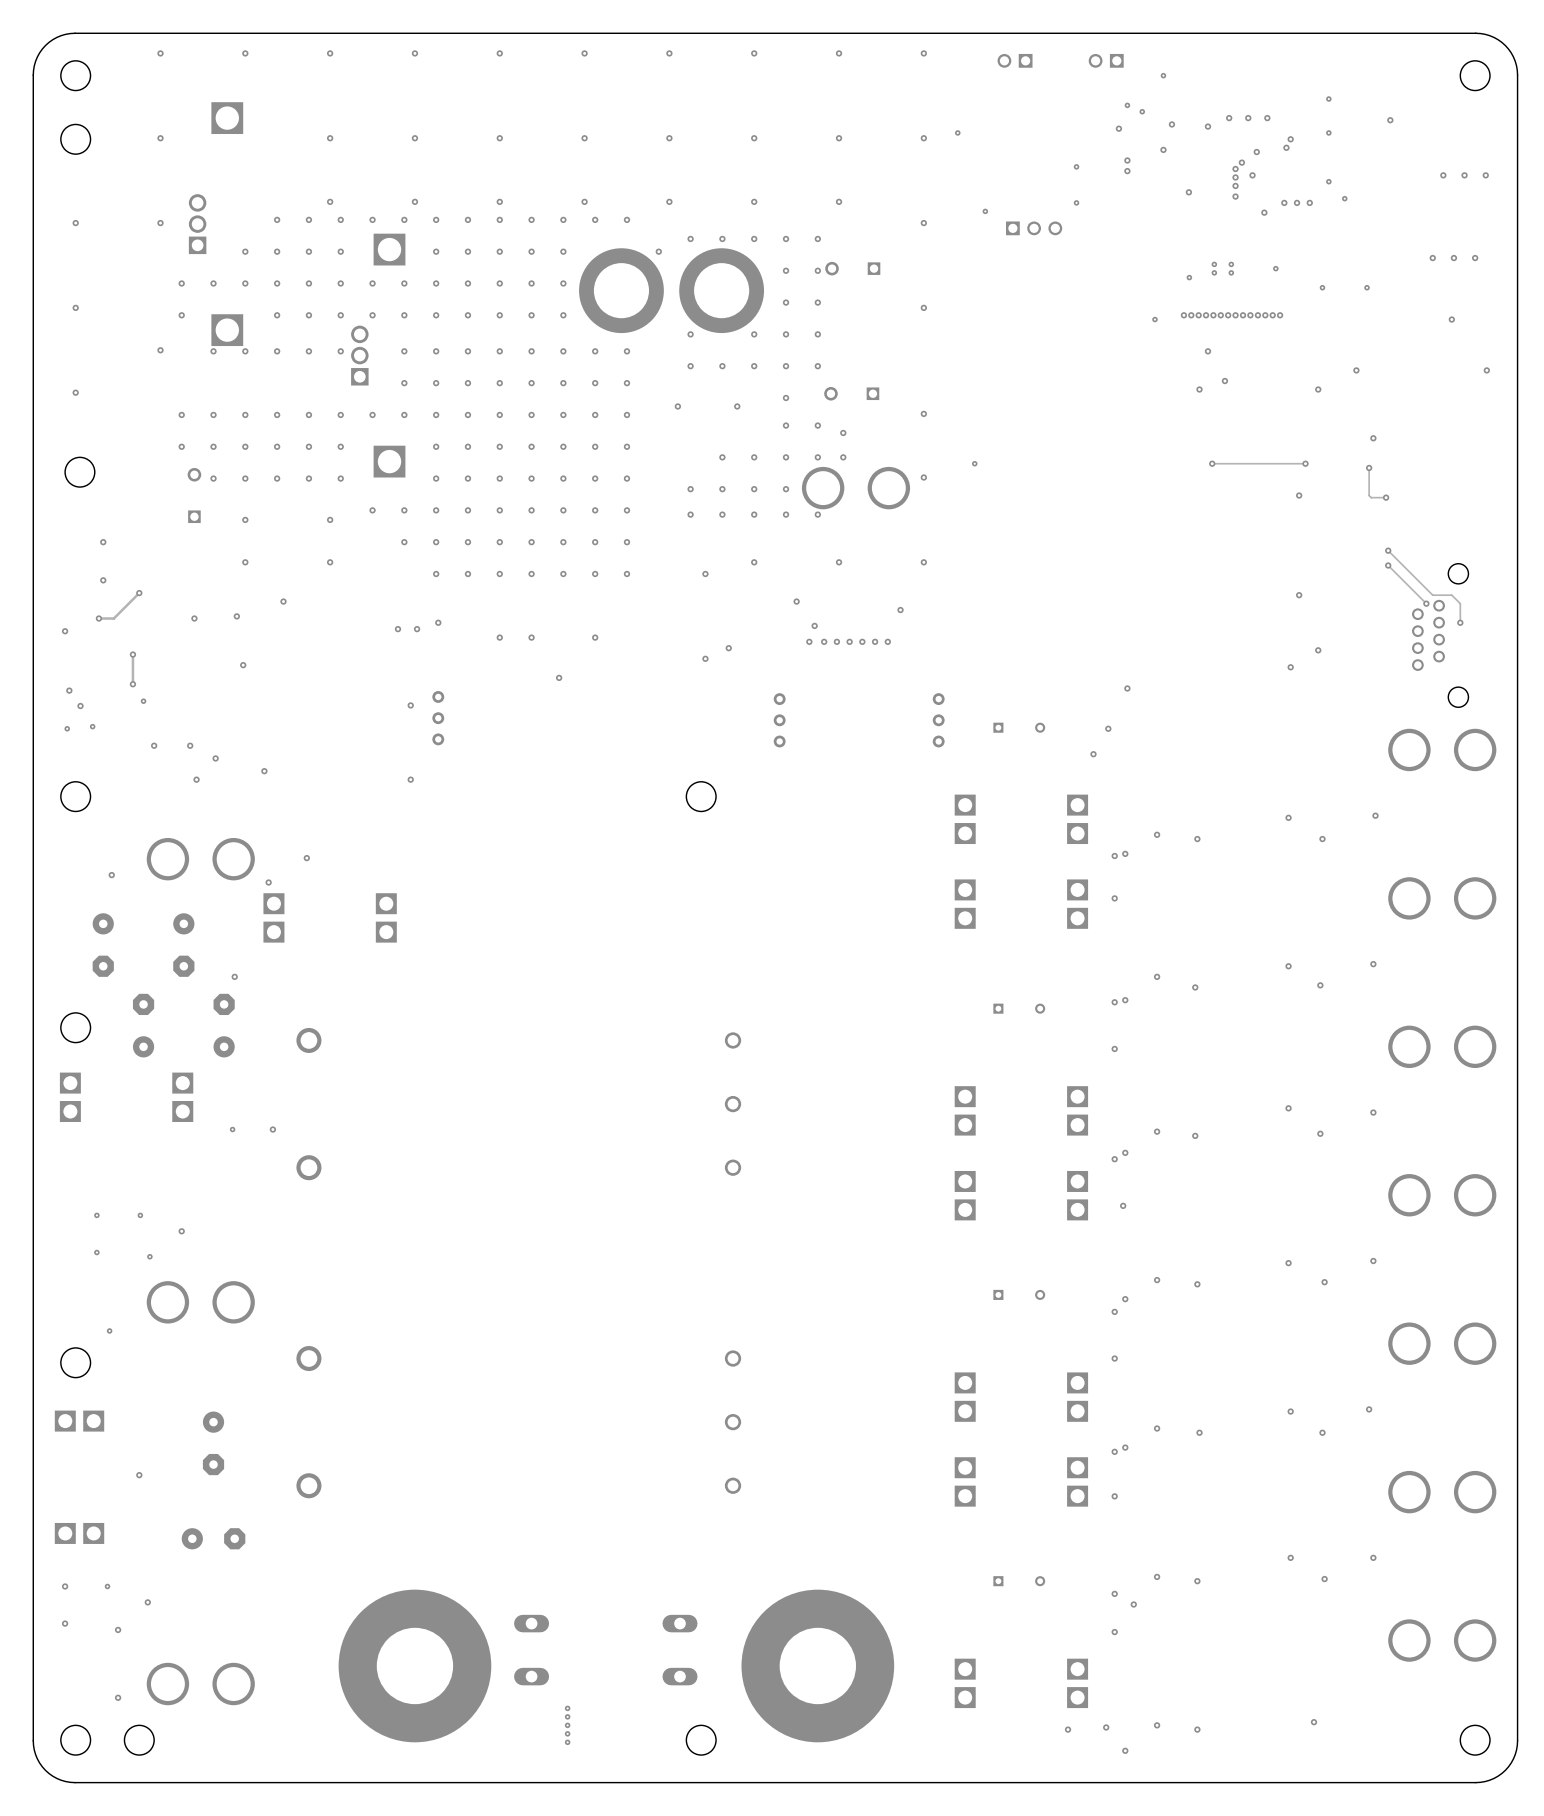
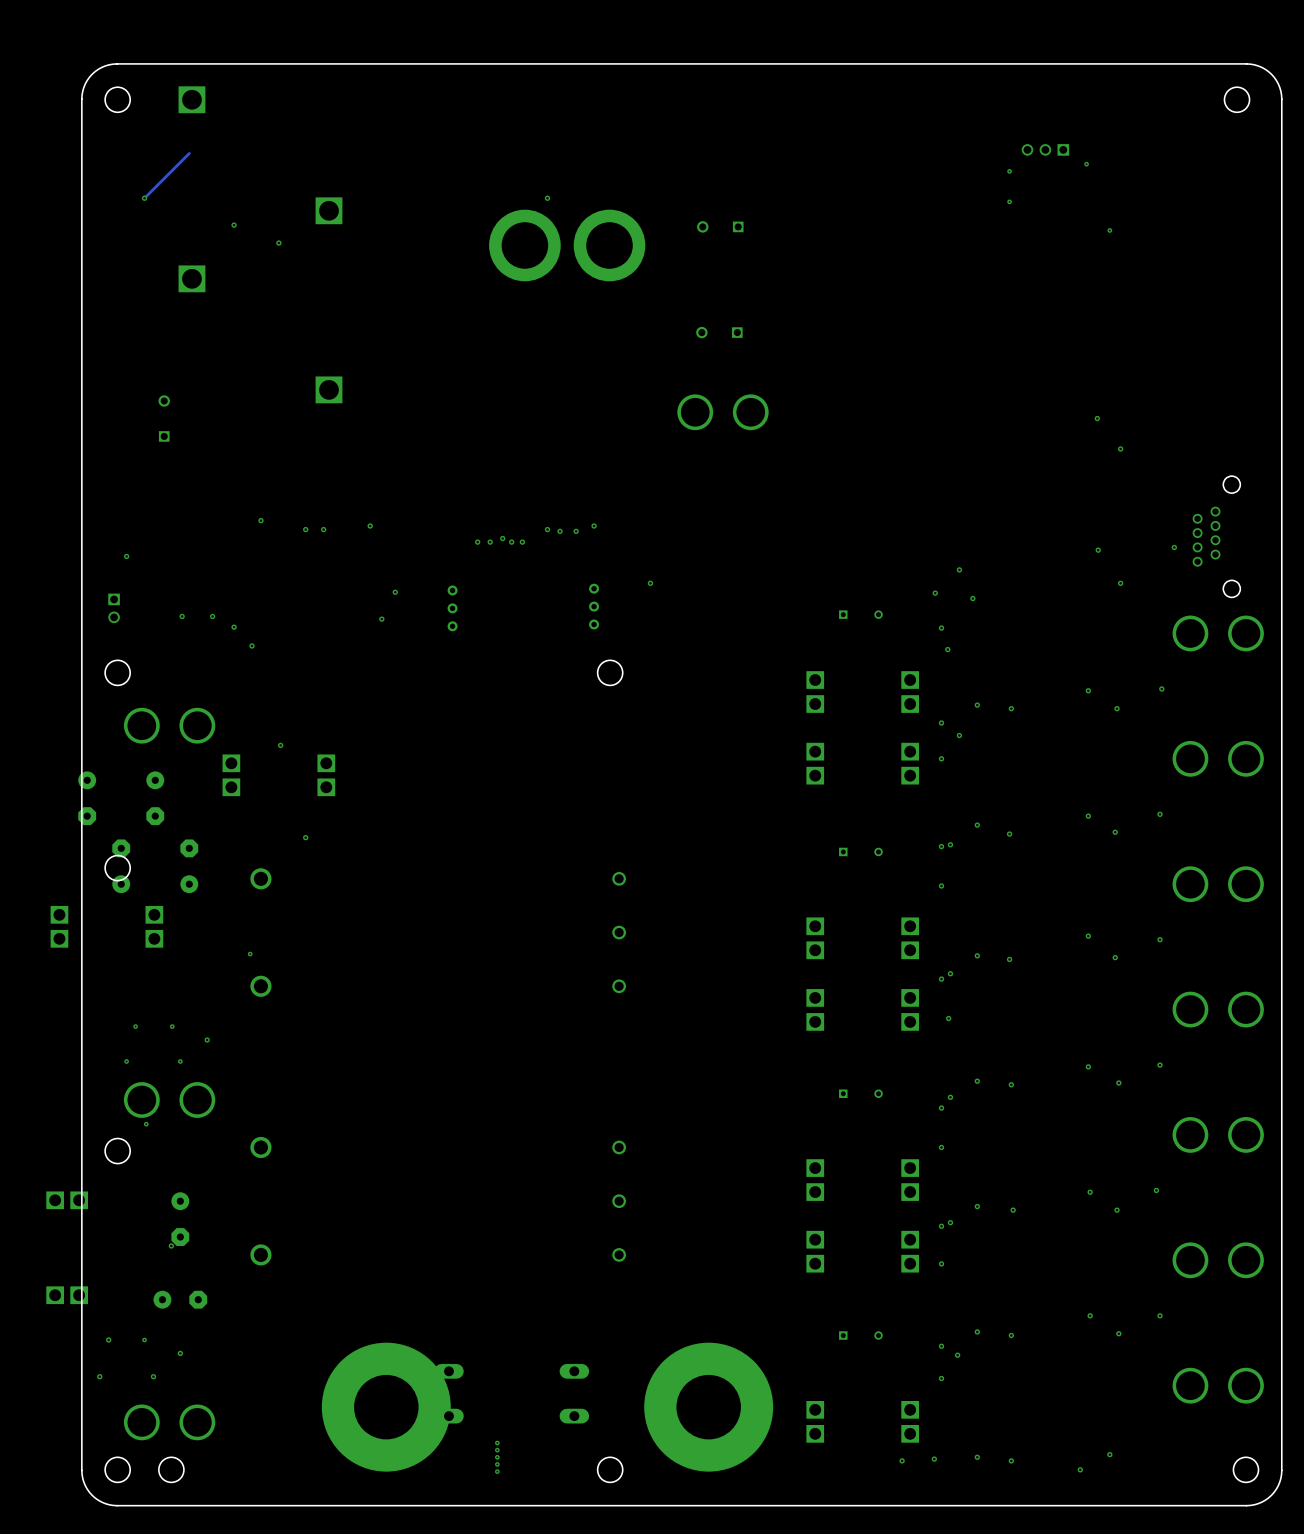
via: (160, 53) -> none
via: (245, 53) -> none
via: (330, 53) -> none
via: (414, 53) -> none
via: (499, 53) -> none
via: (584, 53) -> none
via: (669, 53) -> none
via: (754, 53) -> none
via: (839, 53) -> none
via: (923, 53) -> none
drawing: [60, 60, 91, 91] -> none
part: (1015, 60) -> none
part: (1106, 60) -> none
via: (1163, 75) -> none
drawing position: (1475, 75) -> (1237, 99)
via: (1328, 99) -> none
drawing: none -> [105, 87, 131, 113]
via: (1127, 105) -> none
via: (1142, 111) -> none
board edge: (1517, 117) (1517, 70) (1513, 56) (1508, 49) (1498, 39) (1489, 35) (1475, 33) (75, 33) (56, 37) (42, 49) (35, 61) (33, 75) (33, 1740) (35, 1754) (42, 1766) (49, 1773) (61, 1780) (75, 1782) (138, 1782) -> (1281, 99) (1279, 87) (1271, 74) (1258, 65) (1246, 63) (117, 63) (101, 67) (89, 77) (83, 87) (81, 99) (81, 1470) (83, 1482) (92, 1495) (105, 1503) (117, 1505)
via: (1229, 118) -> none
via: (1248, 118) -> none
via: (1267, 118) -> none
via: (1390, 120) -> none
drawing: [60, 124, 91, 155] -> none
via: (1171, 124) -> none
via: (1207, 126) -> none
via: (1118, 128) -> none
via: (957, 132) -> none
via: (1328, 132) -> none
via: (160, 138) -> none
via: (330, 138) -> none
via: (414, 138) -> none
via: (499, 138) -> none
via: (584, 138) -> none
via: (669, 138) -> none
via: (754, 138) -> none
via: (839, 138) -> none
via: (923, 138) -> none
via: (1290, 139) -> none
via: (1286, 147) -> none
via: (1163, 149) -> none
via: (1256, 152) -> none
via: (1127, 160) -> none
via: (1241, 162) -> none
via: (1076, 166) -> none
via: (1235, 168) -> none
via: (1127, 171) -> none
via: (1252, 175) -> none
via: (1443, 175) -> none
via: (1464, 175) -> none
via: (1485, 175) -> none
via: (1235, 177) -> none
part: none -> (1045, 149)
track: none -> (189, 153) (144, 198)
via: (1328, 181) -> none
via: (1235, 185) -> none
via: (1188, 192) -> none
via: none -> (1086, 164)
via: (1235, 196) -> none
via: (1344, 198) -> none
via: (330, 201) -> none
via: (414, 201) -> none
via: (499, 201) -> none
via: (584, 201) -> none
via: (669, 201) -> none
via: (754, 201) -> none
via: (839, 201) -> none
via: (1076, 202) -> none
via: none -> (1009, 171)
via: (1284, 202) -> none
via: (1297, 202) -> none
via: (1309, 202) -> none
via: (985, 211) -> none
via: (1264, 212) -> none
via: (277, 219) -> none
via: (308, 219) -> none
via: (340, 219) -> none
via: (372, 219) -> none
via: (404, 219) -> none
via: (436, 219) -> none
via: (467, 219) -> none
via: (499, 219) -> none
via: (531, 219) -> none
via: (563, 219) -> none
via: (595, 219) -> none
via: (626, 219) -> none
via: (75, 223) -> none
via position: (160, 223) -> (144, 198)
via: (923, 223) -> none
part: (197, 224) -> none
part: (1034, 228) -> none
via: none -> (547, 198)
via: (690, 238) -> none
via: (722, 238) -> none
via: (754, 238) -> none
via: (786, 238) -> none
via: (817, 238) -> none
via: none -> (1009, 201)
via: (245, 251) -> none
via: (277, 251) -> none
via: (308, 251) -> none
via: (340, 251) -> none
via: (436, 251) -> none
via: (467, 251) -> none
via: (499, 251) -> none
via: (531, 251) -> none
via: (563, 251) -> none
via: (658, 251) -> none
via: (1432, 258) -> none
via: (1453, 258) -> none
via: (1475, 258) -> none
via: (1214, 264) -> none
via: (1231, 264) -> none
via: none -> (234, 225)
via: (1275, 268) -> none
via: (786, 270) -> none
via: (817, 270) -> none
via: (1214, 272) -> none
via: (1231, 272) -> none
via: (1189, 277) -> none
via: (181, 283) -> none
via: (213, 283) -> none
via: (245, 283) -> none
via: (277, 283) -> none
via: (308, 283) -> none
via: (340, 283) -> none
via: (372, 283) -> none
via: (404, 283) -> none
via: (436, 283) -> none
via: (467, 283) -> none
via: (499, 283) -> none
via: (531, 283) -> none
via: (563, 283) -> none
via: none -> (278, 243)
via position: (1322, 287) -> (1109, 230)
via: (1367, 287) -> none
via: (786, 302) -> none
via: (817, 302) -> none
via: (75, 307) -> none
via: (923, 307) -> none
via: (181, 315) -> none
via: (277, 315) -> none
via: (308, 315) -> none
via: (340, 315) -> none
via: (372, 315) -> none
via: (404, 315) -> none
via: (436, 315) -> none
via: (467, 315) -> none
via: (499, 315) -> none
via: (531, 315) -> none
via: (563, 315) -> none
via: (1183, 315) -> none
via: (1191, 315) -> none
via: (1198, 315) -> none
via: (1206, 315) -> none
via: (1213, 315) -> none
via: (1220, 315) -> none
via: (1228, 315) -> none
via: (1235, 315) -> none
via: (1243, 315) -> none
via: (1250, 315) -> none
via: (1257, 315) -> none
via: (1265, 315) -> none
via: (1272, 315) -> none
via: (1280, 315) -> none
via: (1154, 319) -> none
via: (1451, 319) -> none
via: (690, 334) -> none
via: (754, 334) -> none
via: (786, 334) -> none
via: (817, 334) -> none
via: (160, 350) -> none
via: (213, 351) -> none
via: (245, 351) -> none
via: (277, 351) -> none
via: (308, 351) -> none
via: (340, 351) -> none
via: (404, 351) -> none
via: (436, 351) -> none
via: (467, 351) -> none
via: (499, 351) -> none
via: (531, 351) -> none
via: (563, 351) -> none
via: (595, 351) -> none
via: (626, 351) -> none
via: (1207, 351) -> none
part: (359, 355) -> none
via: (690, 366) -> none
via: (722, 366) -> none
via: (754, 366) -> none
via: (786, 366) -> none
via: (817, 366) -> none
via: (1356, 370) -> none
via: (1486, 370) -> none
via: (1224, 381) -> none
via: (404, 383) -> none
via: (436, 383) -> none
via: (467, 383) -> none
via: (499, 383) -> none
via: (531, 383) -> none
via: (563, 383) -> none
via: (595, 383) -> none
via: (626, 383) -> none
via: (1199, 389) -> none
via: (1318, 389) -> none
via: (75, 392) -> none
via: (786, 397) -> none
via: (677, 406) -> none
via: (737, 406) -> none
via: (923, 413) -> none
via: (181, 414) -> none
via: (213, 414) -> none
via: (245, 414) -> none
via: (277, 414) -> none
via: (308, 414) -> none
via: (340, 414) -> none
via: (372, 414) -> none
via: (404, 414) -> none
via: (436, 414) -> none
via: (467, 414) -> none
via: (499, 414) -> none
via: (531, 414) -> none
via: (563, 414) -> none
via: (595, 414) -> none
via: (626, 414) -> none
via: (786, 425) -> none
via: (817, 425) -> none
via: (843, 432) -> none
via: (1373, 438) -> none
via: (181, 446) -> none
via: (213, 446) -> none
via: (245, 446) -> none
via: (277, 446) -> none
via: (308, 446) -> none
via: (340, 446) -> none
via: (436, 446) -> none
via: (467, 446) -> none
via: (499, 446) -> none
via: (531, 446) -> none
via: (563, 446) -> none
via: (595, 446) -> none
via: (626, 446) -> none
drawing: [64, 457, 95, 488] -> none
via: (722, 457) -> none
via: (754, 457) -> none
via: (786, 457) -> none
via: (817, 457) -> none
via: (843, 457) -> none
via: (974, 463) -> none
via: (1212, 463) -> none
track: (1305, 463) (1212, 463) -> none
via: (1305, 463) -> none
track: (1369, 467) (1369, 495) (1371, 497) (1386, 497) -> none
via: (1369, 467) -> none
via: (923, 477) -> none
via: (213, 478) -> none
via: (245, 478) -> none
via: (277, 478) -> none
via: (308, 478) -> none
via: (340, 478) -> none
via: (436, 478) -> none
via: (467, 478) -> none
via: (499, 478) -> none
via: (531, 478) -> none
via: (563, 478) -> none
via: (595, 478) -> none
via: (626, 478) -> none
via: (690, 489) -> none
via: (722, 489) -> none
via: (754, 489) -> none
via: (786, 489) -> none
via: (1386, 497) -> none
via: (372, 510) -> none
via: (404, 510) -> none
via: (436, 510) -> none
via: (467, 510) -> none
via: (499, 510) -> none
via: (531, 510) -> none
via: (563, 510) -> none
via: (595, 510) -> none
via: (626, 510) -> none
via: (690, 514) -> none
via: (722, 514) -> none
via: (754, 514) -> none
via: (786, 514) -> none
via: (817, 514) -> none
via: (245, 519) -> none
via: (330, 519) -> none
via: none -> (1120, 448)
via: (103, 542) -> none
via: (404, 542) -> none
via: (436, 542) -> none
via: (467, 542) -> none
via: (499, 542) -> none
via: (531, 542) -> none
via: (563, 542) -> none
via: (595, 542) -> none
via: (626, 542) -> none
track: (1388, 550) (1432, 595) (1451, 595) (1460, 603) (1460, 622) -> none
via: (1388, 550) -> none
via: (245, 562) -> none
via: (330, 562) -> none
via: (754, 562) -> none
via: (839, 562) -> none
via: (923, 562) -> none
track: (1388, 565) (1426, 603) -> none
via: (1388, 565) -> none
via: (436, 573) -> none
via: (467, 573) -> none
via: (499, 573) -> none
via: (531, 573) -> none
via: (563, 573) -> none
via: (595, 573) -> none
via: (626, 573) -> none
via: (705, 573) -> none
via: (103, 580) -> none
track: (139, 593) (113, 618) (98, 618) -> none
via: (139, 593) -> none
via: (1299, 595) -> none
via: (283, 601) -> none
via: (796, 601) -> none
via: (1426, 603) -> none
via: (900, 610) -> none
via: (236, 616) -> none
via: none -> (260, 520)
via: (98, 618) -> none
via: (194, 618) -> none
via: none -> (594, 526)
via: (1460, 622) -> none
via: (814, 625) -> none
via: none -> (305, 529)
via: none -> (547, 529)
via position: (397, 629) -> (323, 529)
via: (417, 629) -> none
via: none -> (560, 531)
via: none -> (576, 531)
via: (65, 631) -> none
via: (499, 637) -> none
via: (531, 637) -> none
via: none -> (477, 542)
via: none -> (490, 542)
via: none -> (511, 542)
via: none -> (522, 542)
via: (809, 641) -> none
via: (824, 641) -> none
via: (836, 641) -> none
via: (849, 641) -> none
via: (862, 641) -> none
via: (875, 641) -> none
via: (887, 641) -> none
via: (728, 648) -> none
via: none -> (1174, 547)
via: (1318, 650) -> none
via: none -> (1098, 550)
track: (132, 654) (132, 684) -> none
via: (132, 654) -> none
via: none -> (126, 556)
via: (705, 658) -> none
via: (243, 665) -> none
via: (1290, 667) -> none
via: none -> (959, 569)
via: (559, 677) -> none
via: (132, 684) -> none
via: (1127, 688) -> none
via: (69, 690) -> none
via: none -> (650, 583)
via: none -> (1120, 583)
via: (143, 701) -> none
via: none -> (395, 592)
via: none -> (935, 593)
via: (410, 705) -> none
via: (80, 706) -> none
via: none -> (972, 598)
part position: (438, 718) -> (452, 608)
part: none -> (114, 608)
part position: (779, 720) -> (594, 606)
part: (938, 720) -> none
via: (92, 726) -> none
via: (67, 728) -> none
via: (1108, 728) -> none
via: none -> (182, 616)
via: none -> (212, 616)
via: none -> (381, 619)
via: none -> (234, 627)
via: none -> (941, 628)
via: (154, 745) -> none
via: (190, 745) -> none
via: (1093, 754) -> none
via: (215, 758) -> none
via: none -> (251, 645)
via: none -> (947, 649)
via: (264, 771) -> none
via: (196, 779) -> none
via: (410, 779) -> none
drawing position: (75, 796) -> (117, 672)
drawing position: (701, 796) -> (610, 672)
via position: (1125, 853) -> (959, 735)
via: (306, 858) -> none
via: (111, 875) -> none
via: (268, 882) -> none
via: none -> (280, 745)
via: (234, 976) -> none
via: none -> (305, 837)
drawing position: (75, 1027) -> (117, 868)
via: (232, 1129) -> none
via: (272, 1129) -> none
via: none -> (250, 954)
via: (96, 1215) -> none
via position: (140, 1215) -> (135, 1026)
via: none -> (172, 1026)
via: (181, 1231) -> none
via: none -> (207, 1040)
via: (96, 1252) -> none
via: none -> (180, 1061)
via: (109, 1330) -> none
via: none -> (146, 1124)
drawing position: (75, 1362) -> (117, 1151)
via: (139, 1475) -> none
via: none -> (171, 1245)
via: (65, 1586) -> none
via: (107, 1586) -> none
via: none -> (108, 1340)
via: none -> (144, 1340)
via: (147, 1602) -> none
via: none -> (180, 1353)
via: (65, 1623) -> none
via: none -> (153, 1376)
part position: (414, 1665) -> (386, 1407)
part position: (817, 1665) -> (708, 1407)
via: (118, 1697) -> none
via: (567, 1708) -> none
via: none -> (497, 1442)
via: (567, 1716) -> none
via: none -> (497, 1450)
via: (567, 1725) -> none
via: none -> (497, 1457)
via: (567, 1733) -> none
via: none -> (497, 1464)
drawing position: (75, 1740) -> (171, 1469)
drawing position: (701, 1740) -> (610, 1469)
via: none -> (1080, 1469)
via: (567, 1742) -> none
via: none -> (497, 1471)
via: (1125, 1750) -> none

